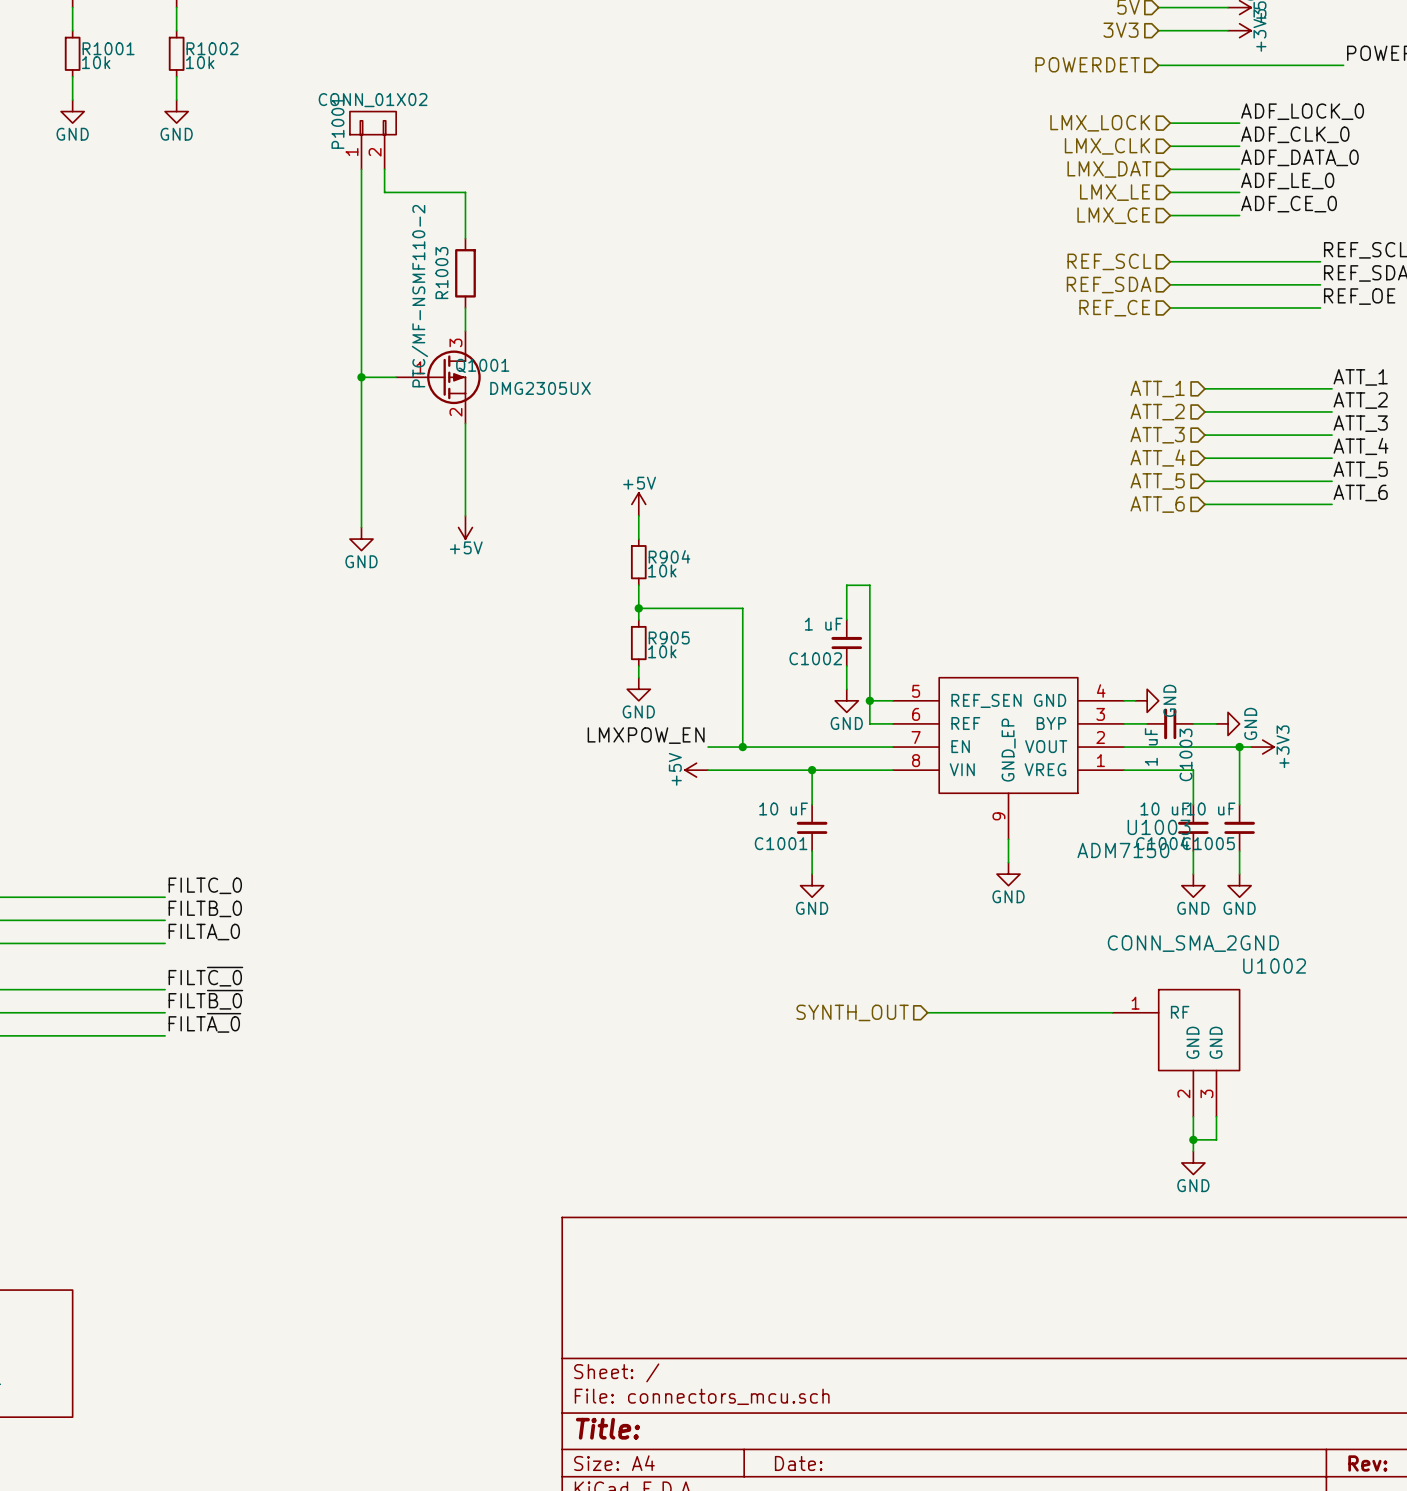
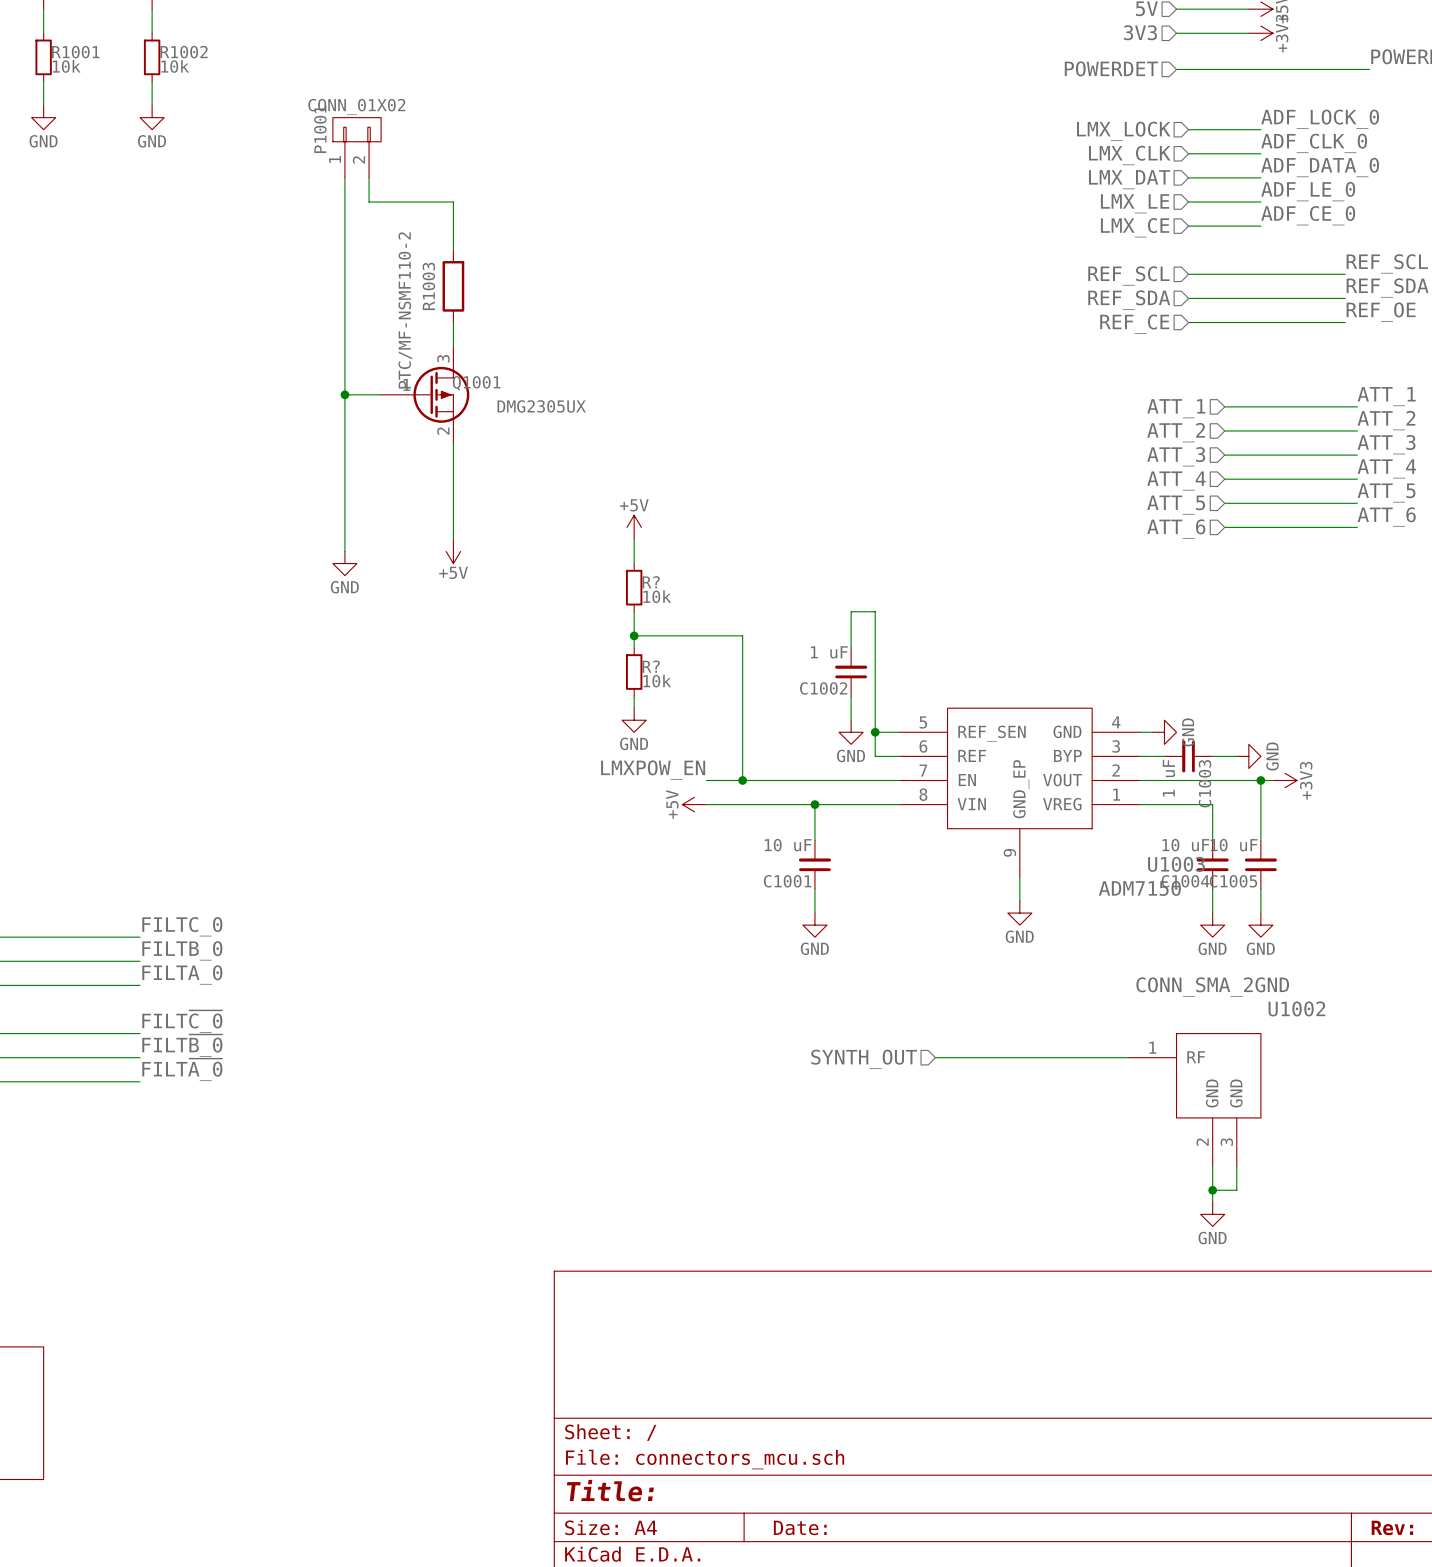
R904 name: R904 (669, 556) -> R? (651, 582)
R905 name: R905 (669, 637) -> R? (651, 666)

